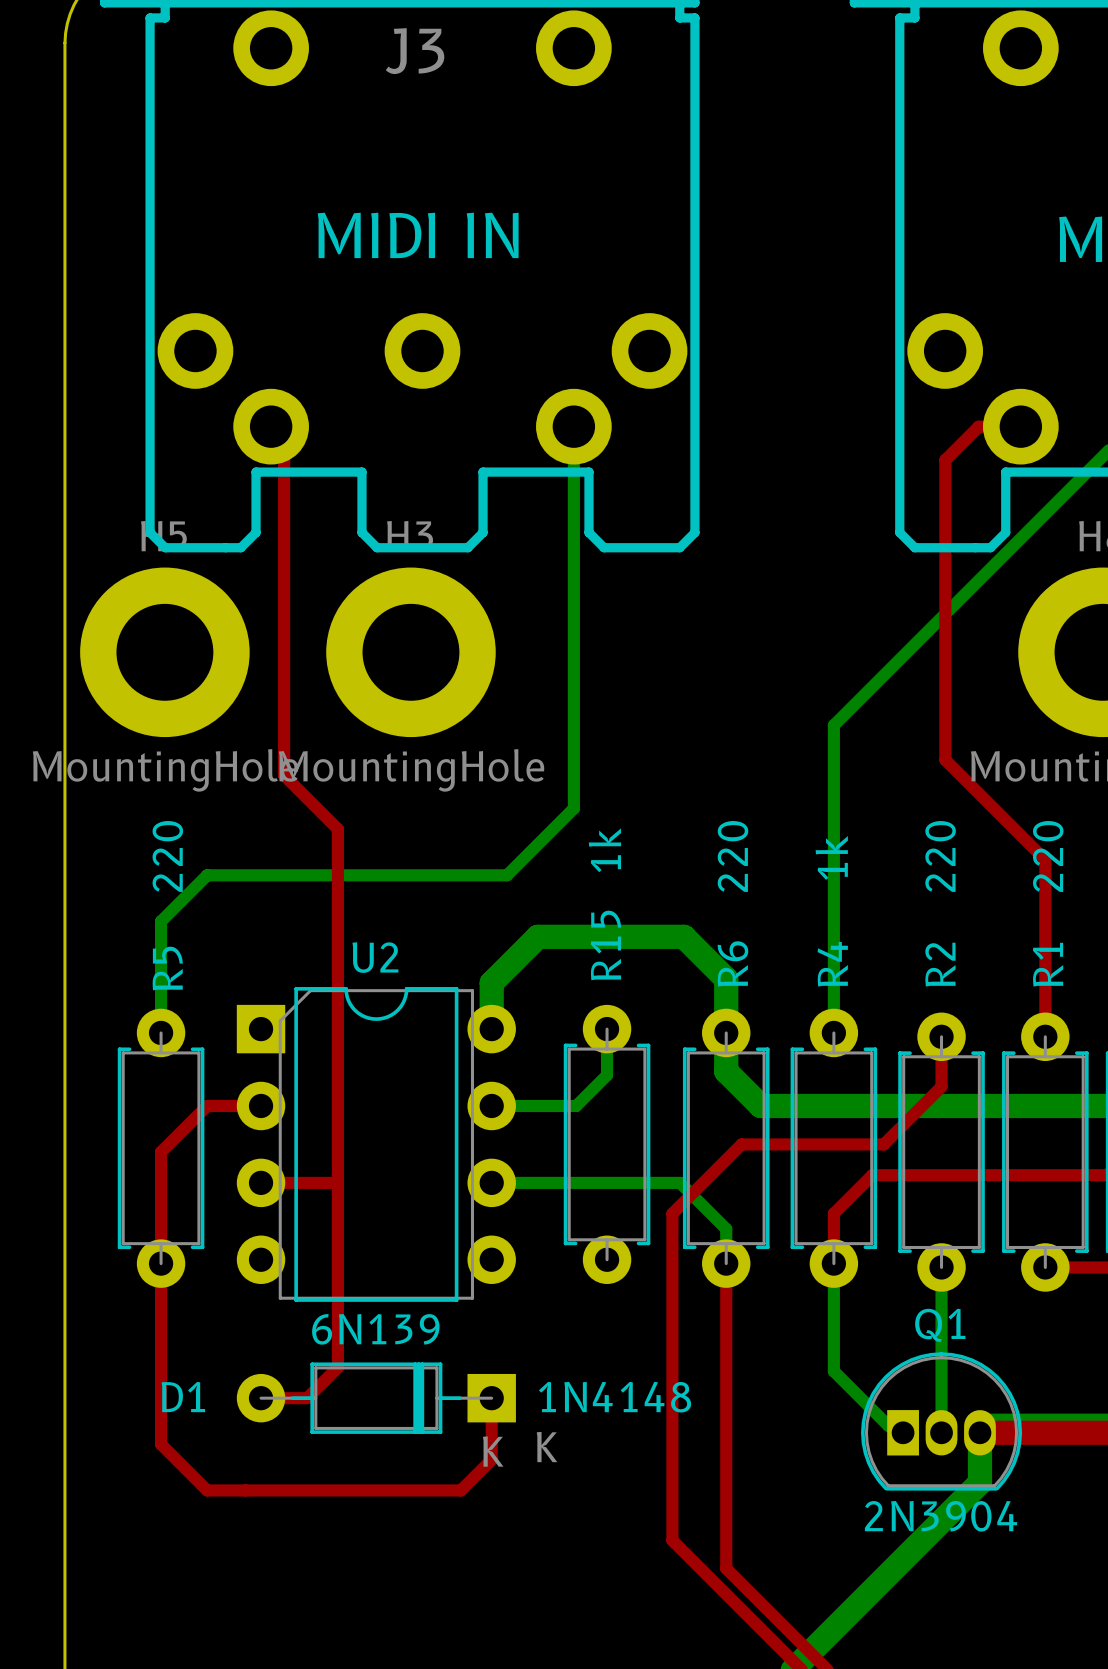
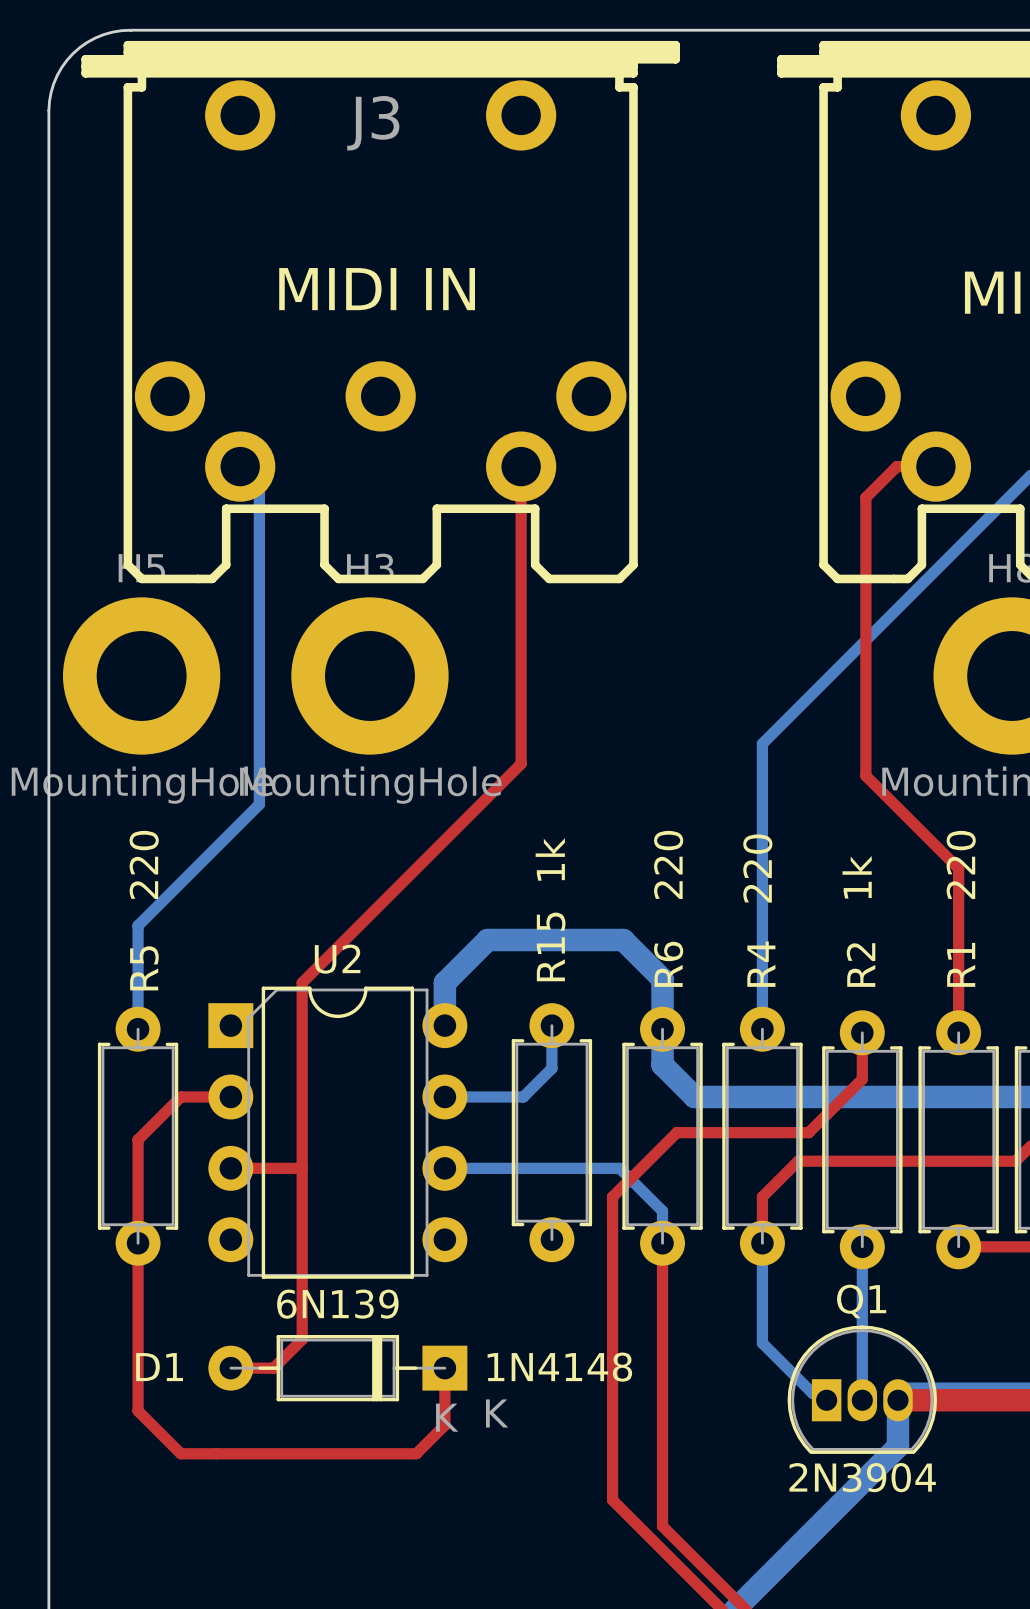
bottom track: (573, 418) (573, 808) (507, 875) (207, 875) -> (240, 466) (259, 485) (259, 804) (180, 882)
top track: (284, 431) (284, 775) (337, 829) (337, 982) -> (521, 466) (521, 763) (302, 982)
R4 value position: 220 (940, 856) -> 220 (757, 868)
R2 value position: 1k (831, 857) -> 1k (857, 877)

